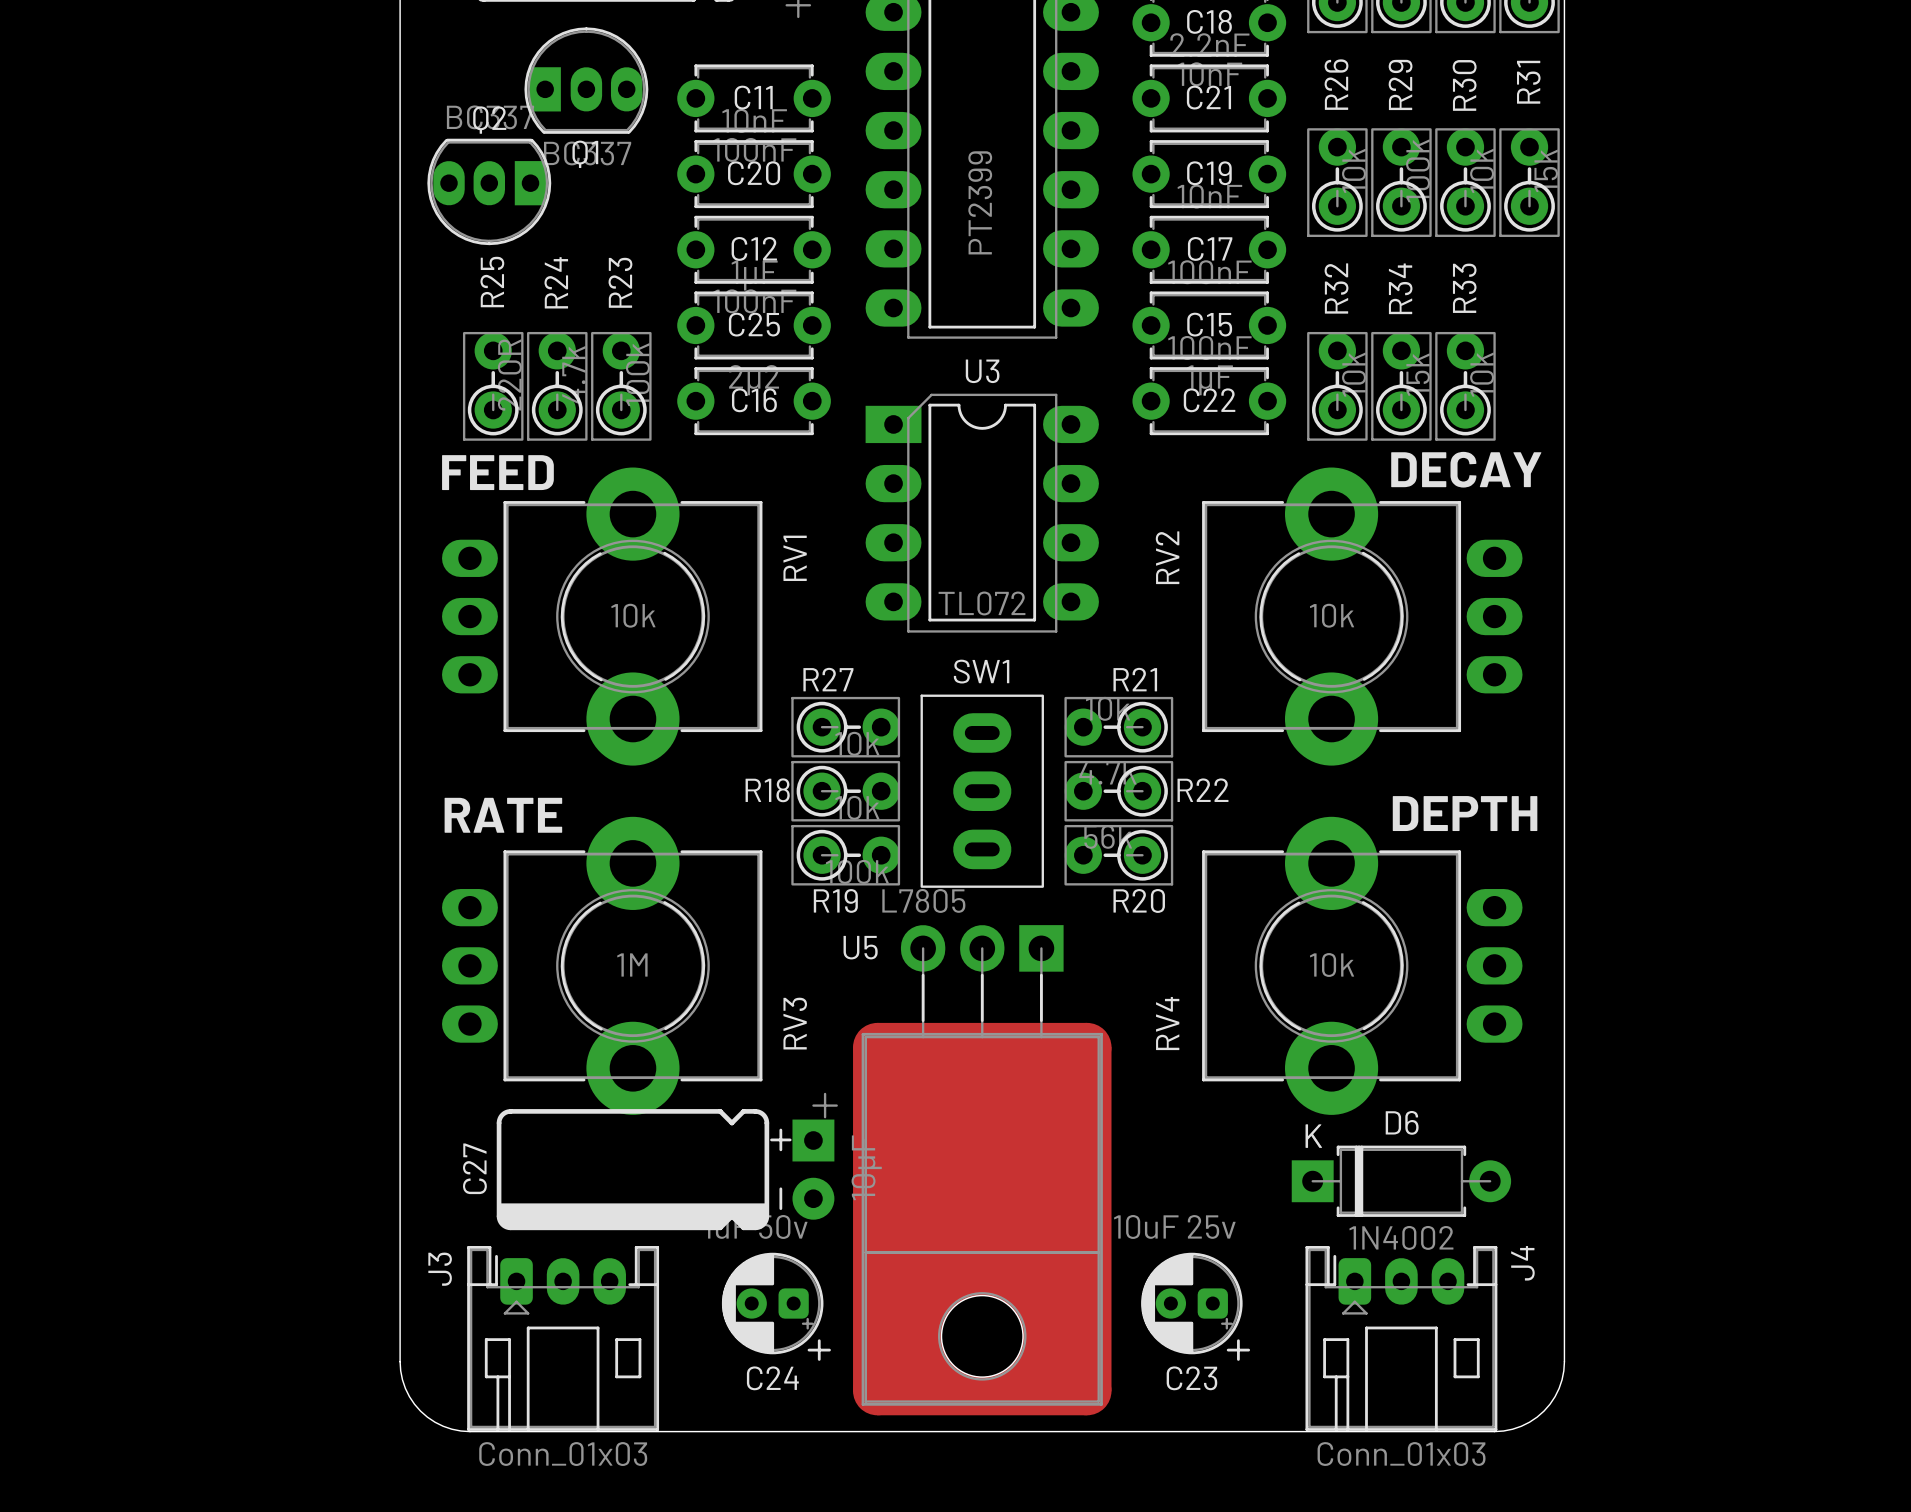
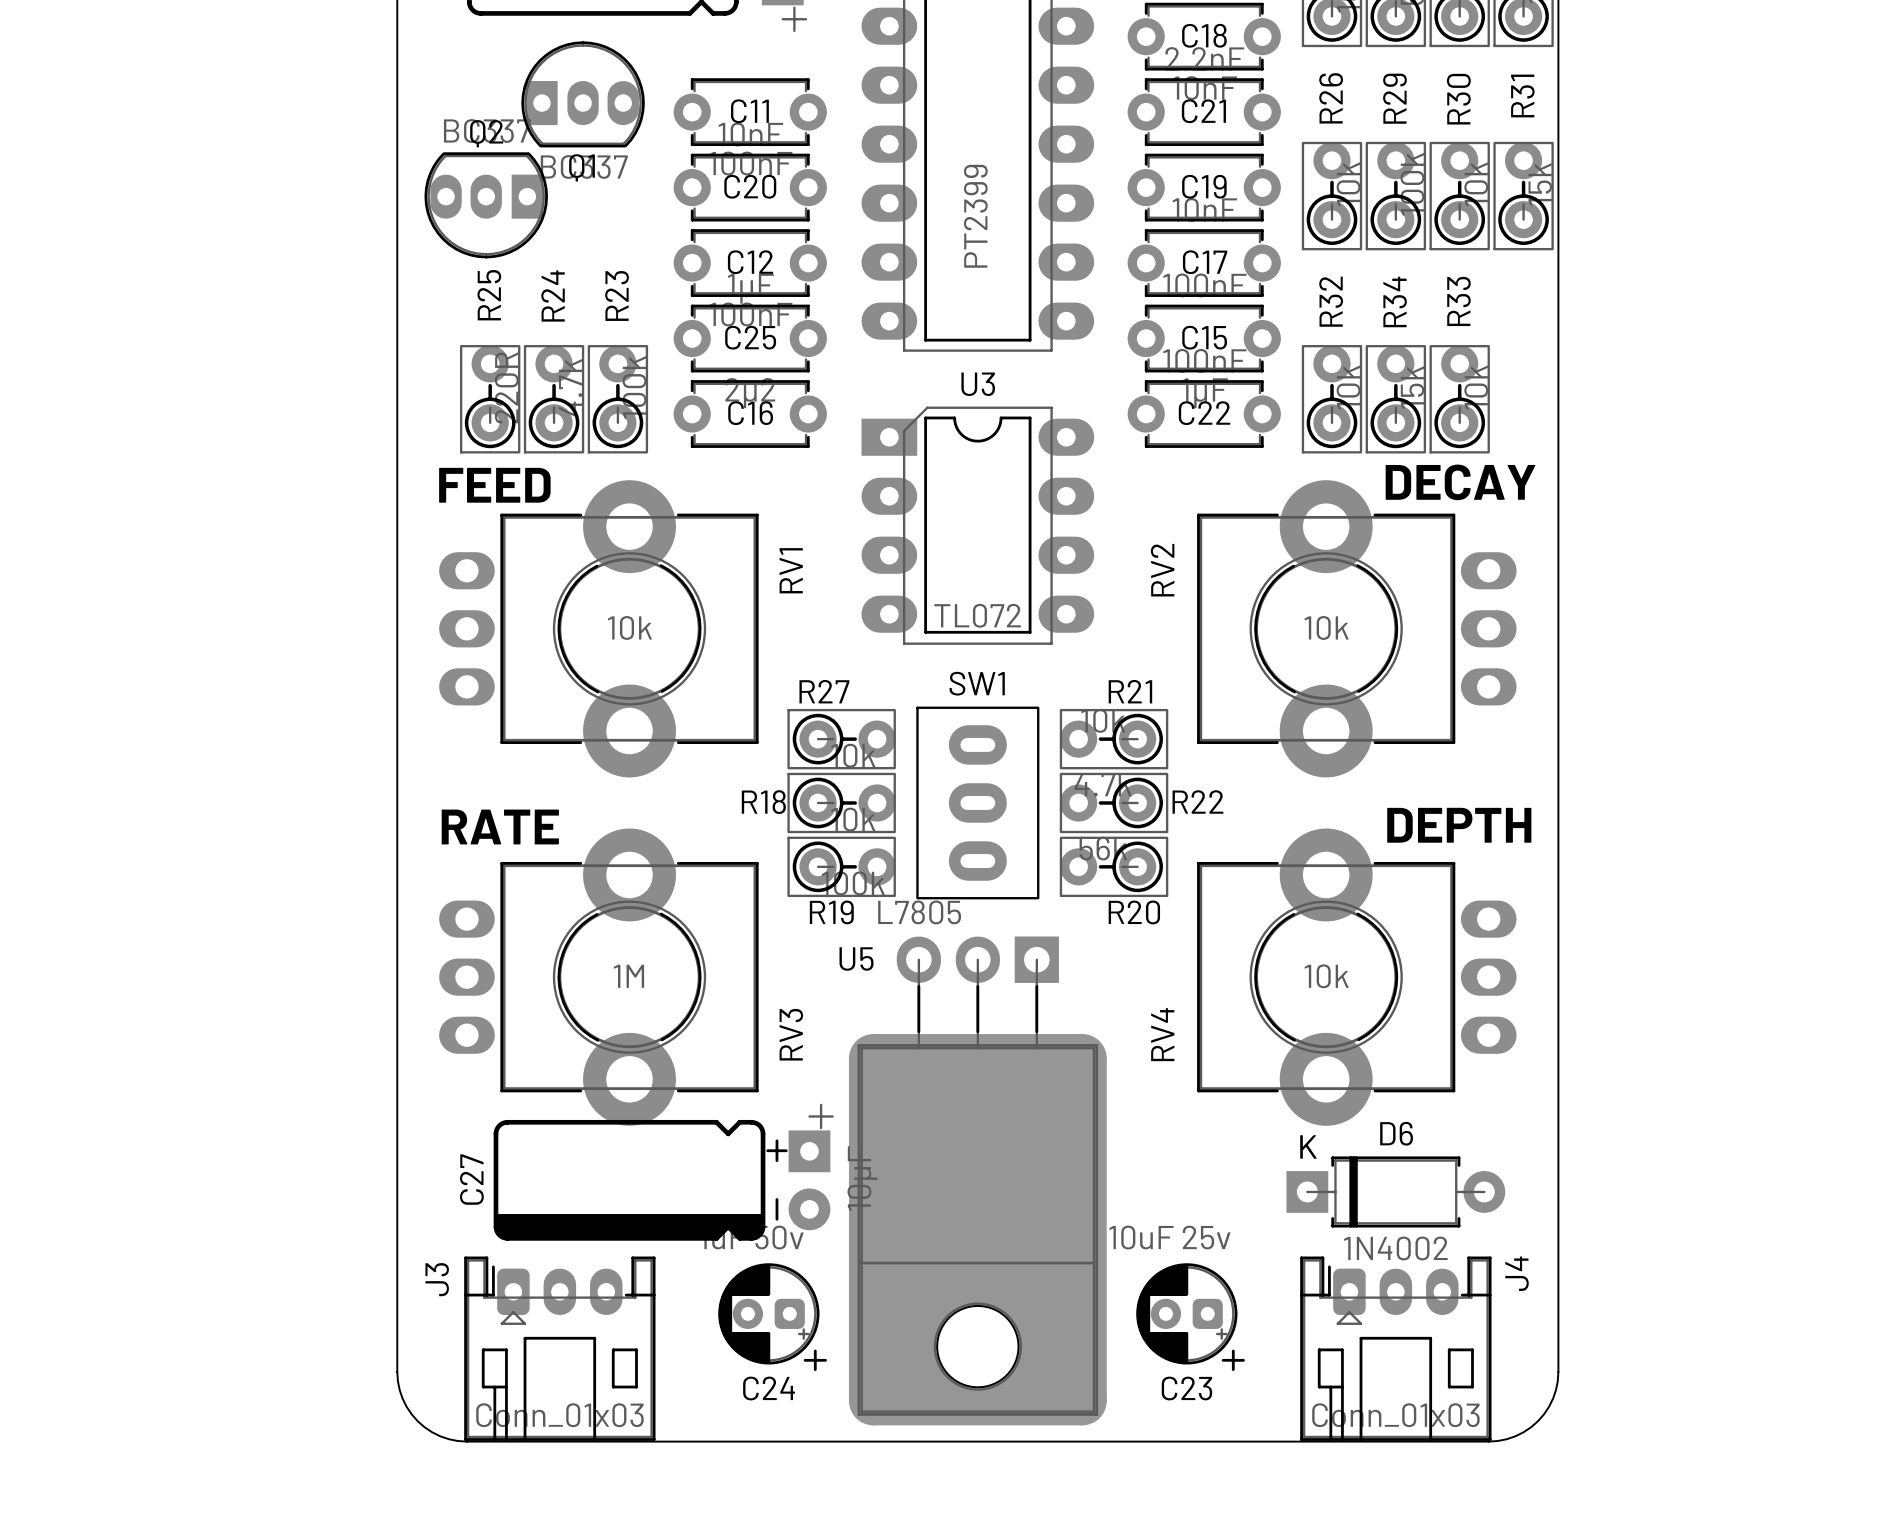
J3 value position: Conn_01x03 (563, 1454) -> Conn_01x03 (559, 1415)
J4 value position: Conn_01x03 (1401, 1454) -> Conn_01x03 (1395, 1415)

